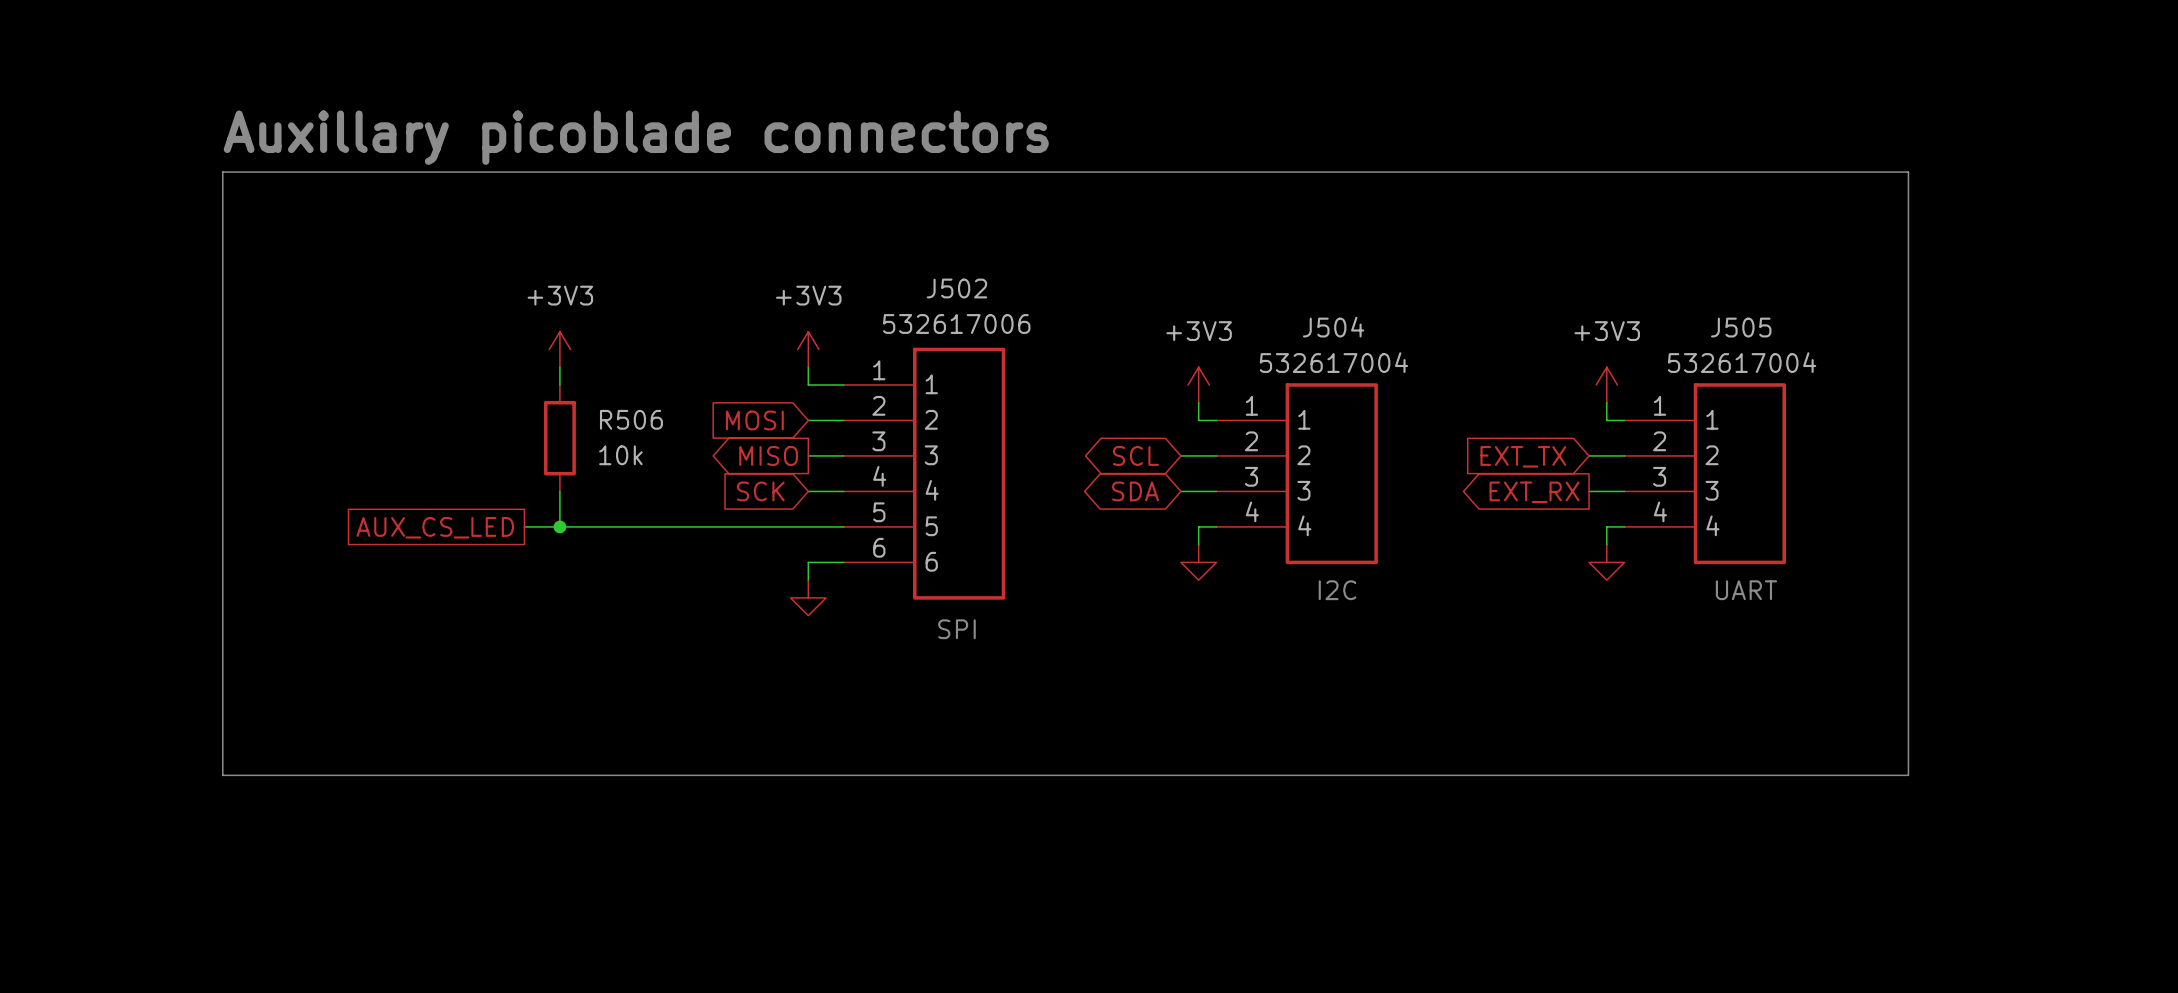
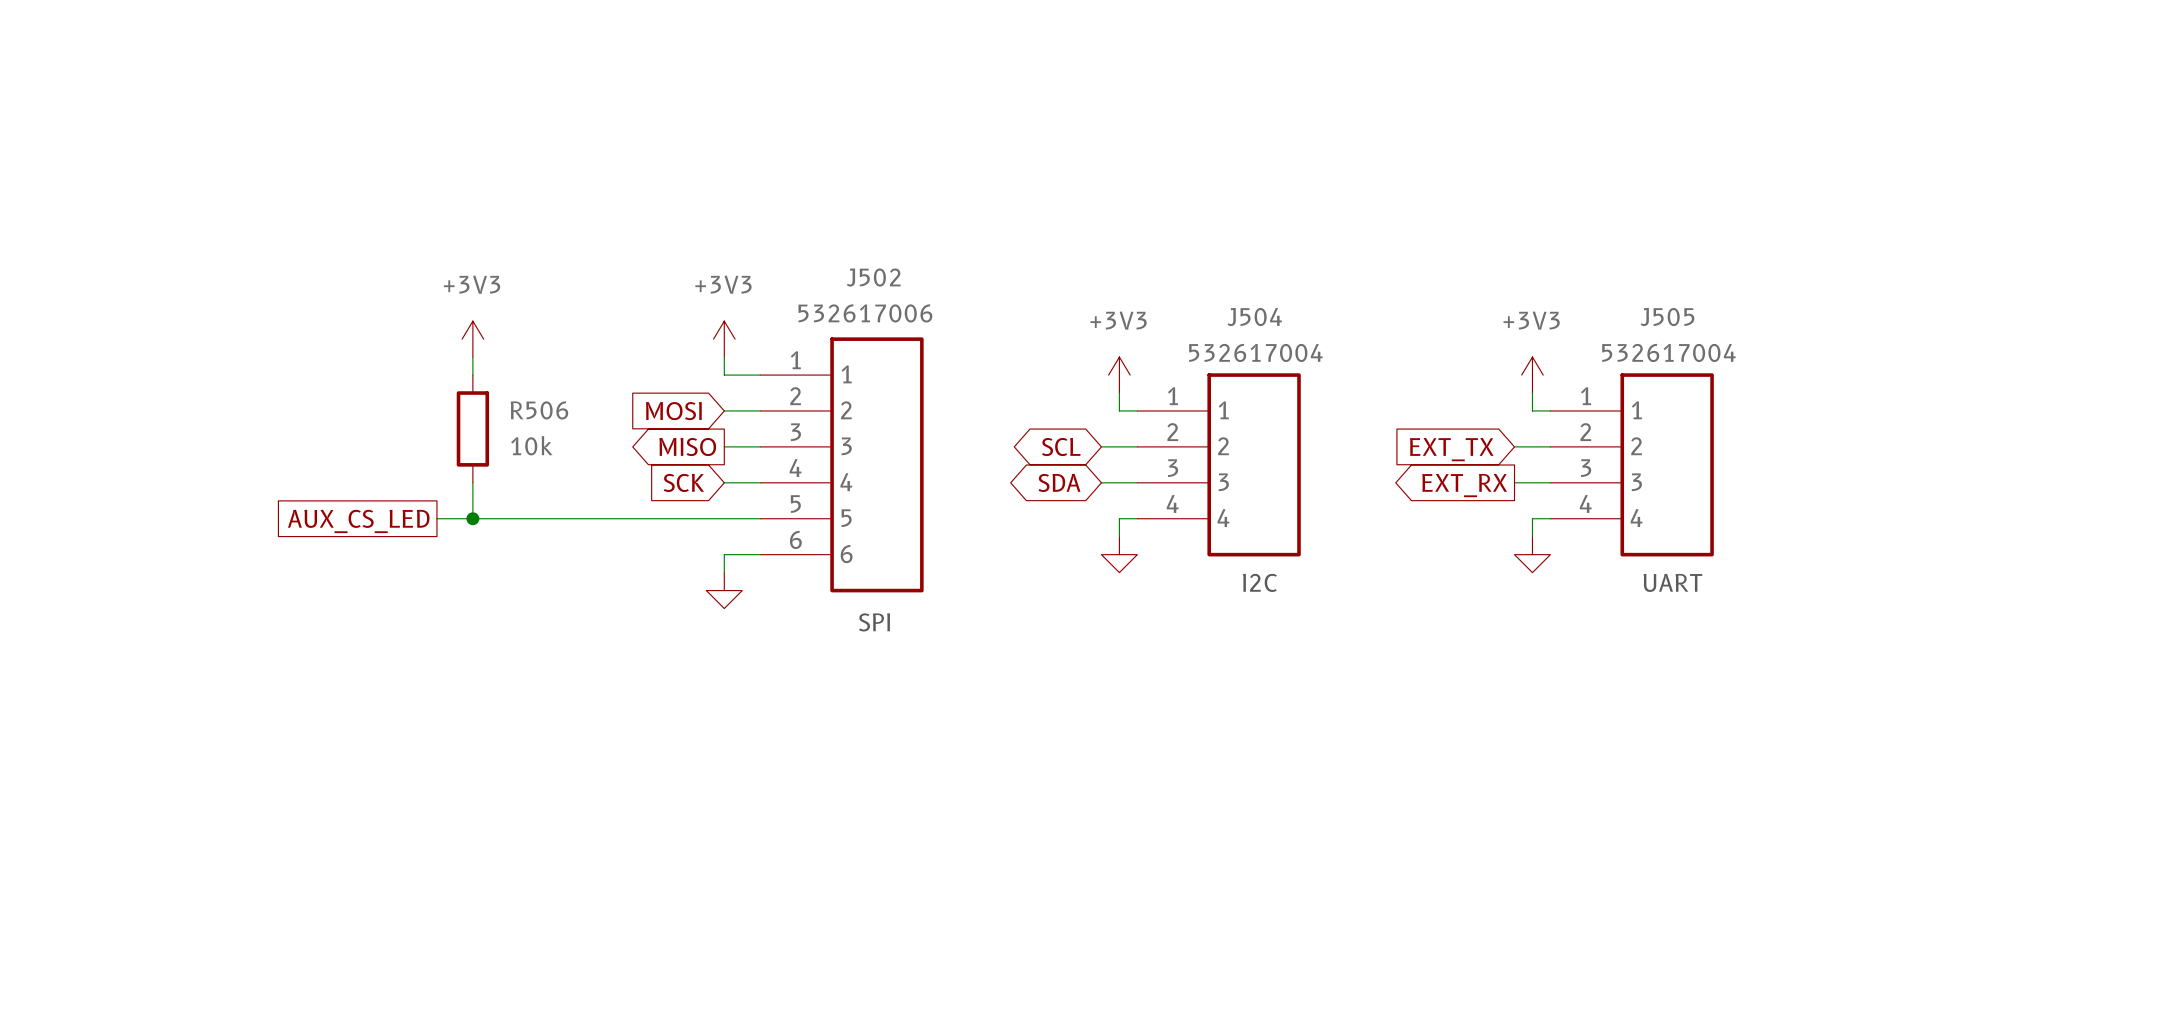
text: Auxillary picoblade connectors (636, 137) -> none
line: (222, 172) (1908, 172) (1908, 775) (222, 775) (222, 172) -> none

